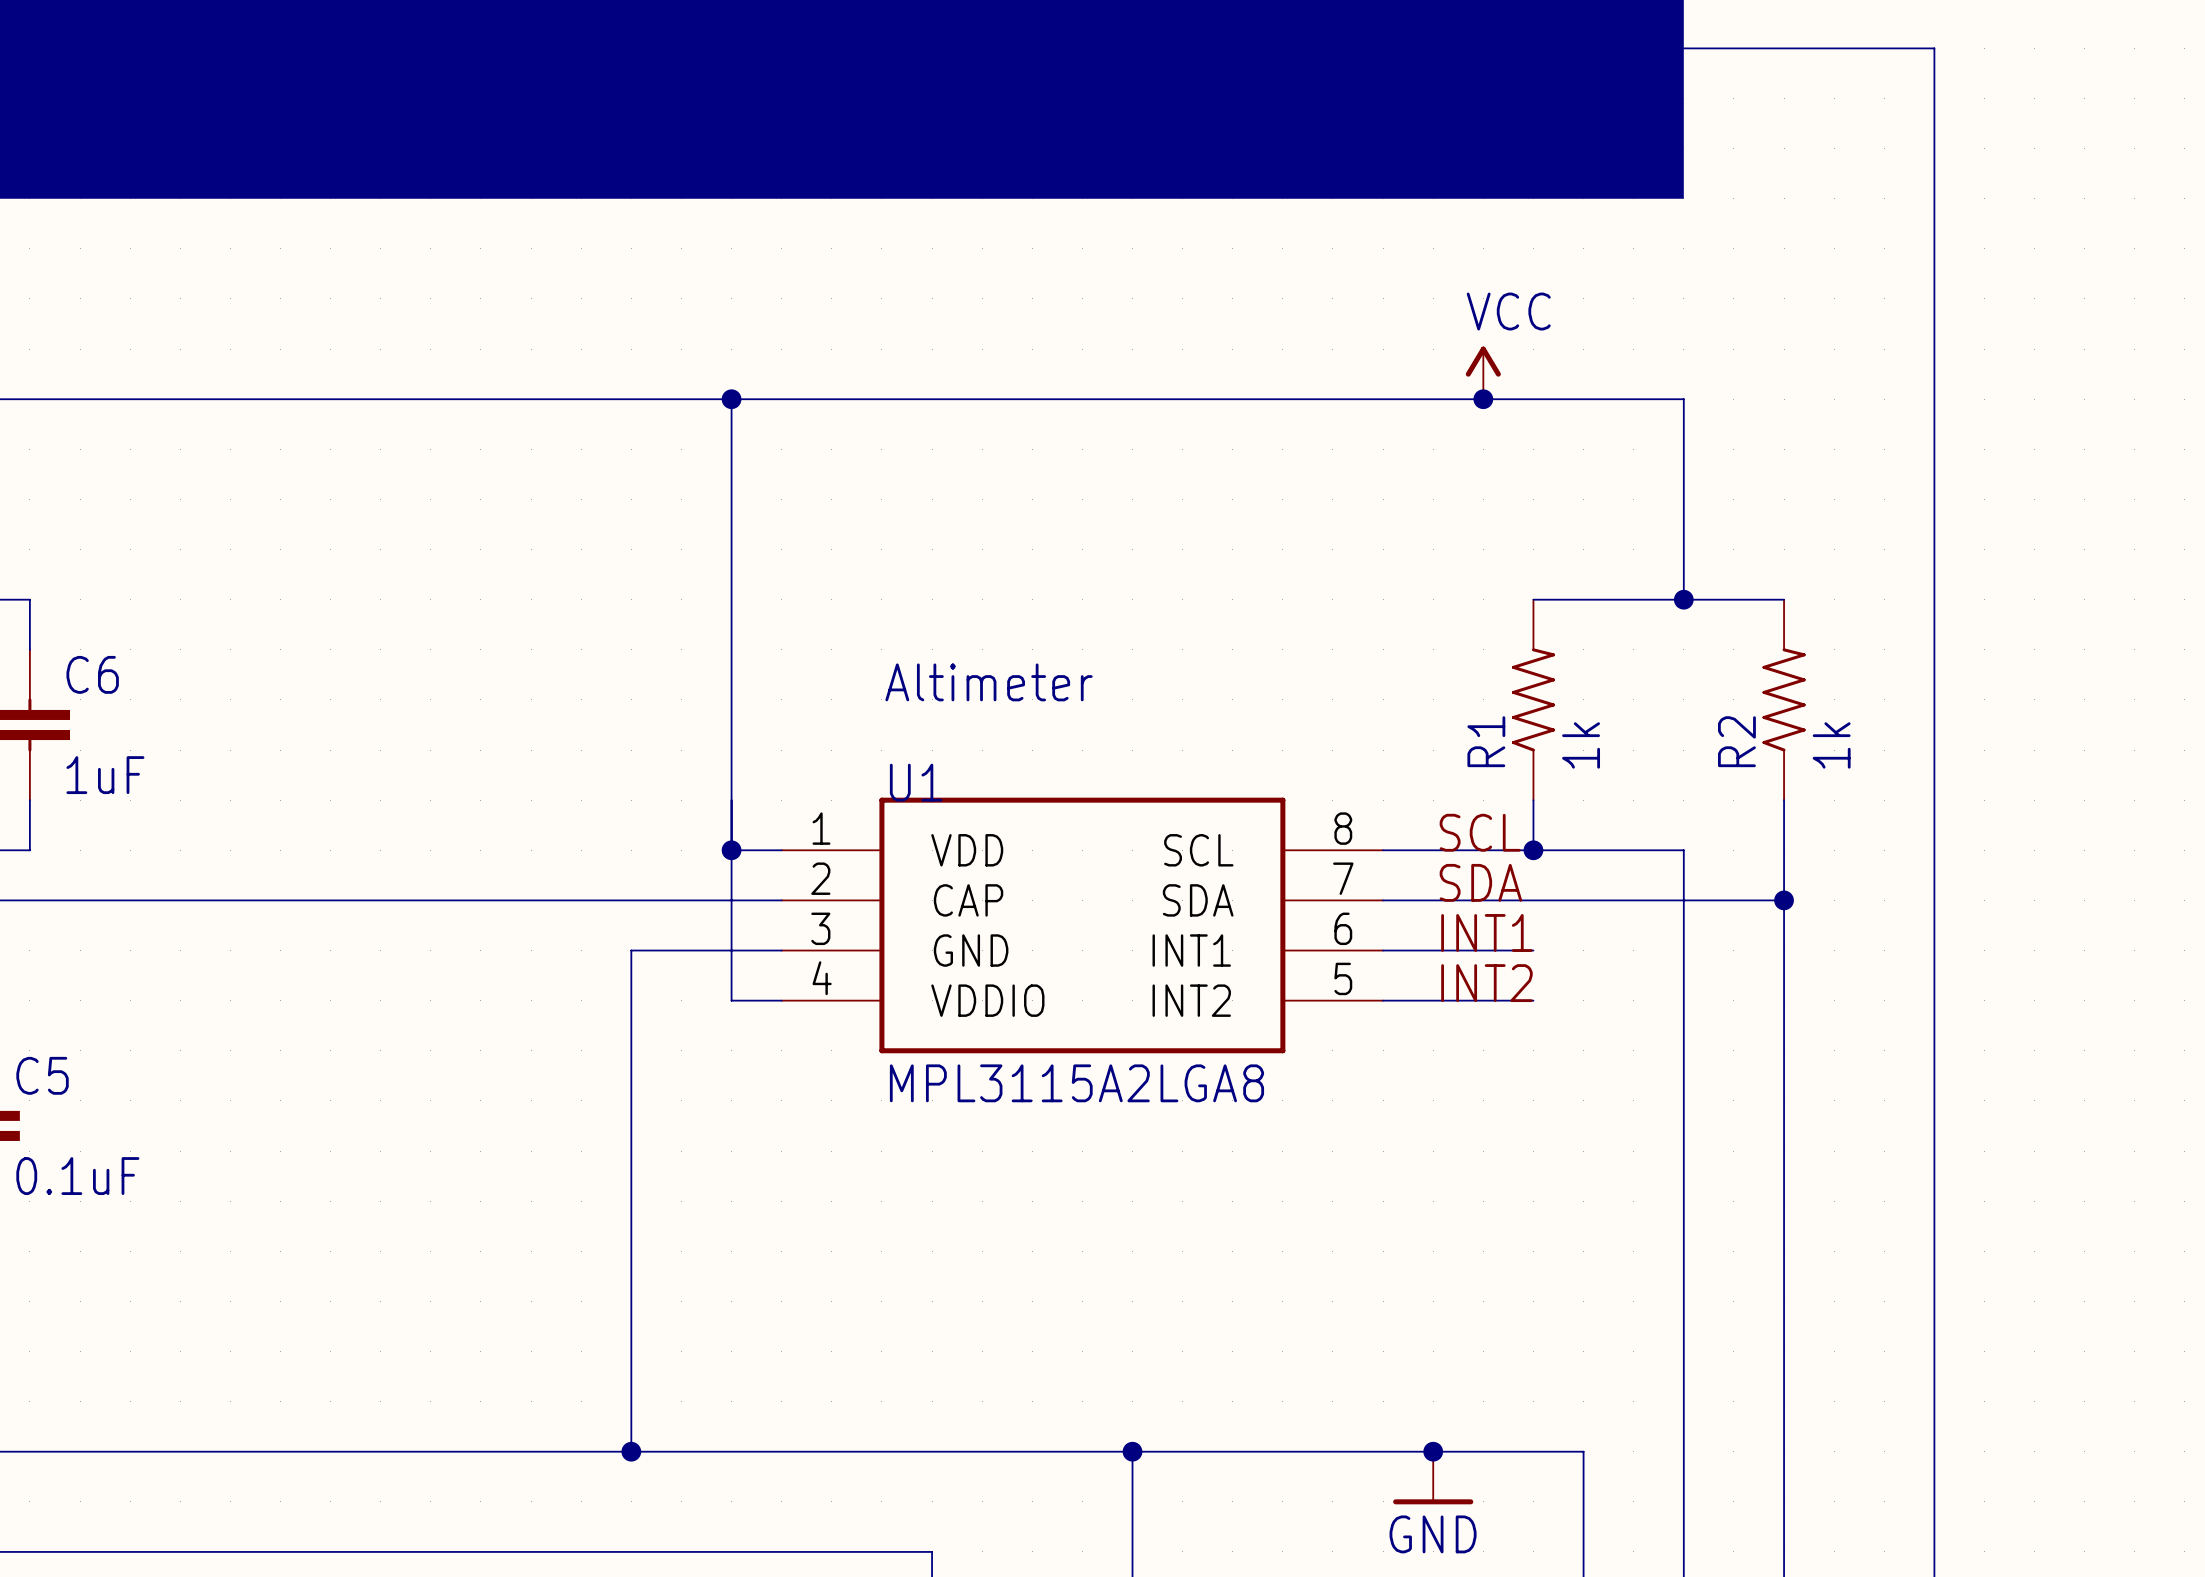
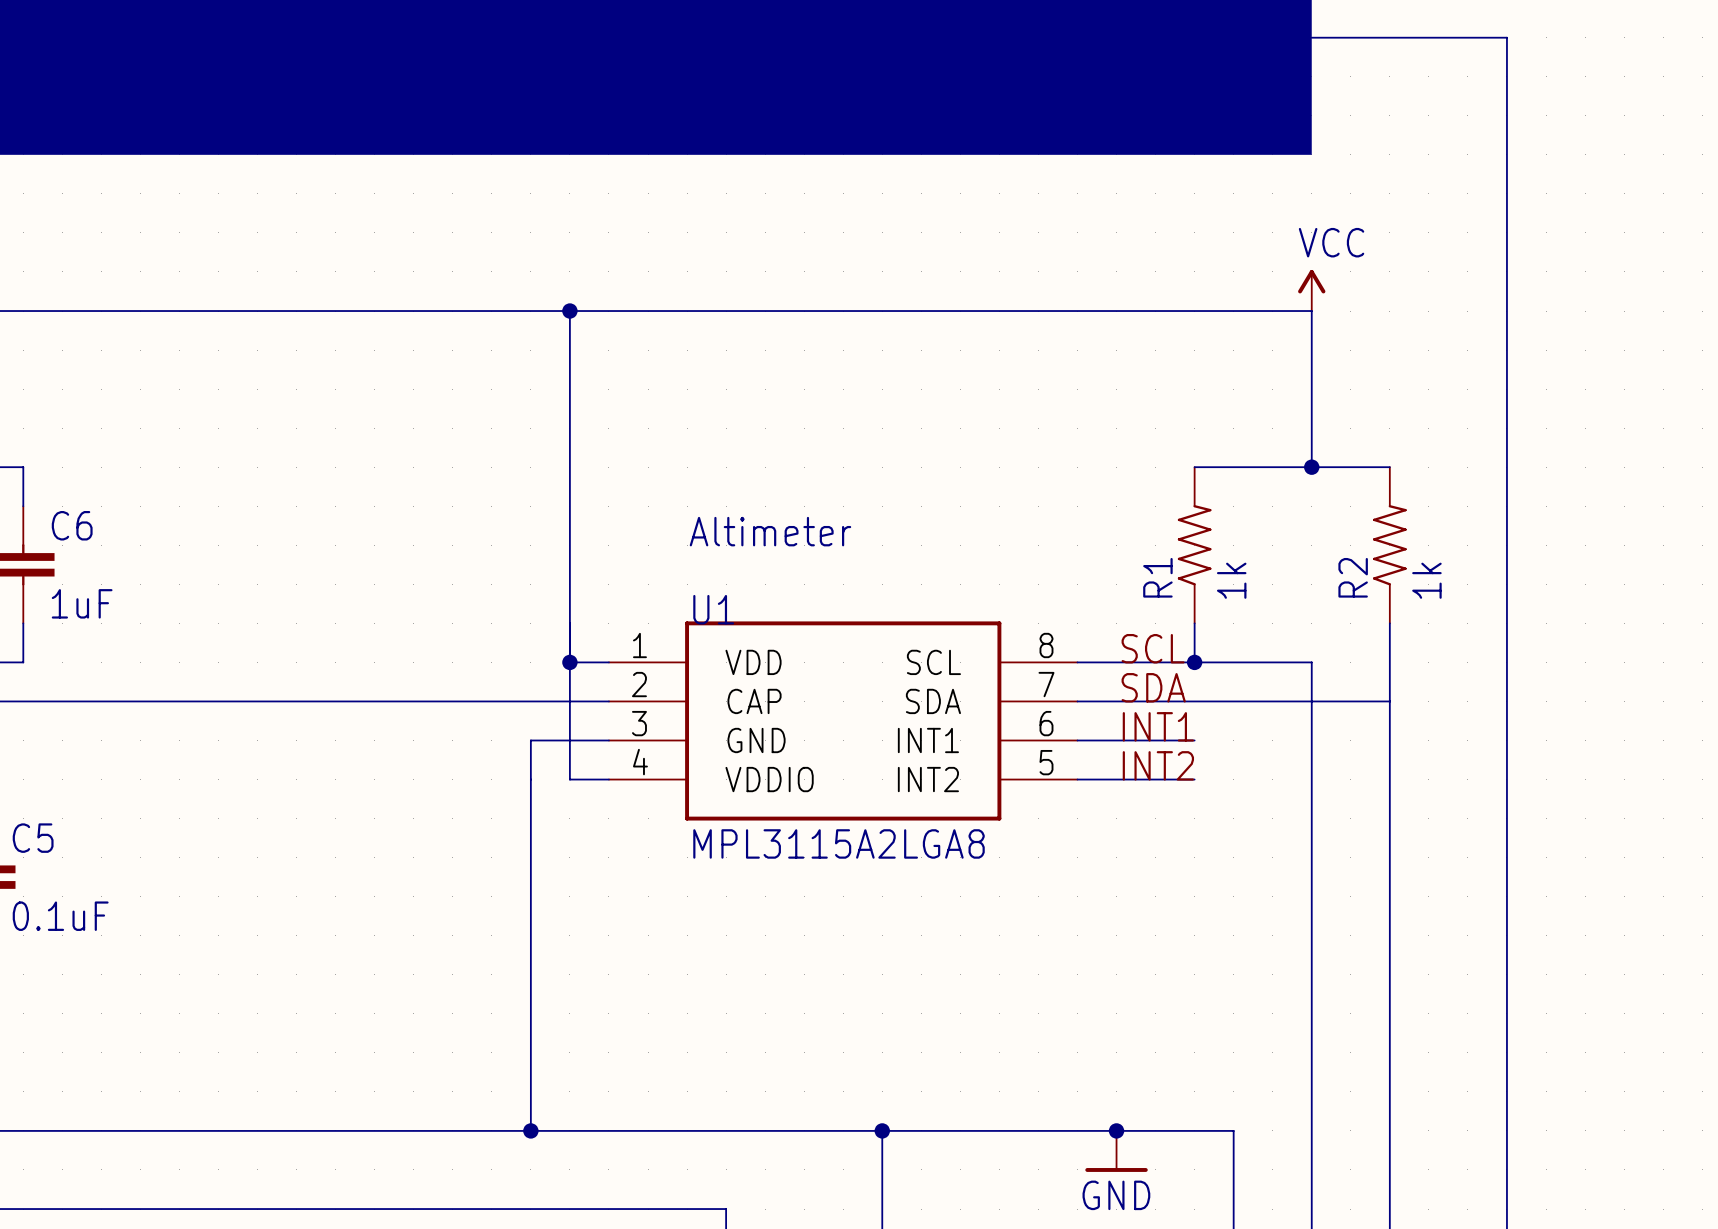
power symbol position: VCC (1483, 372) -> VCC (1311, 290)
junction: (1483, 399) -> none
junction: (1784, 900) -> none
wire: (681, 950) (631, 950) (631, 1451) -> (530, 740) (530, 1130)
junction position: (631, 1451) -> (530, 1130)

